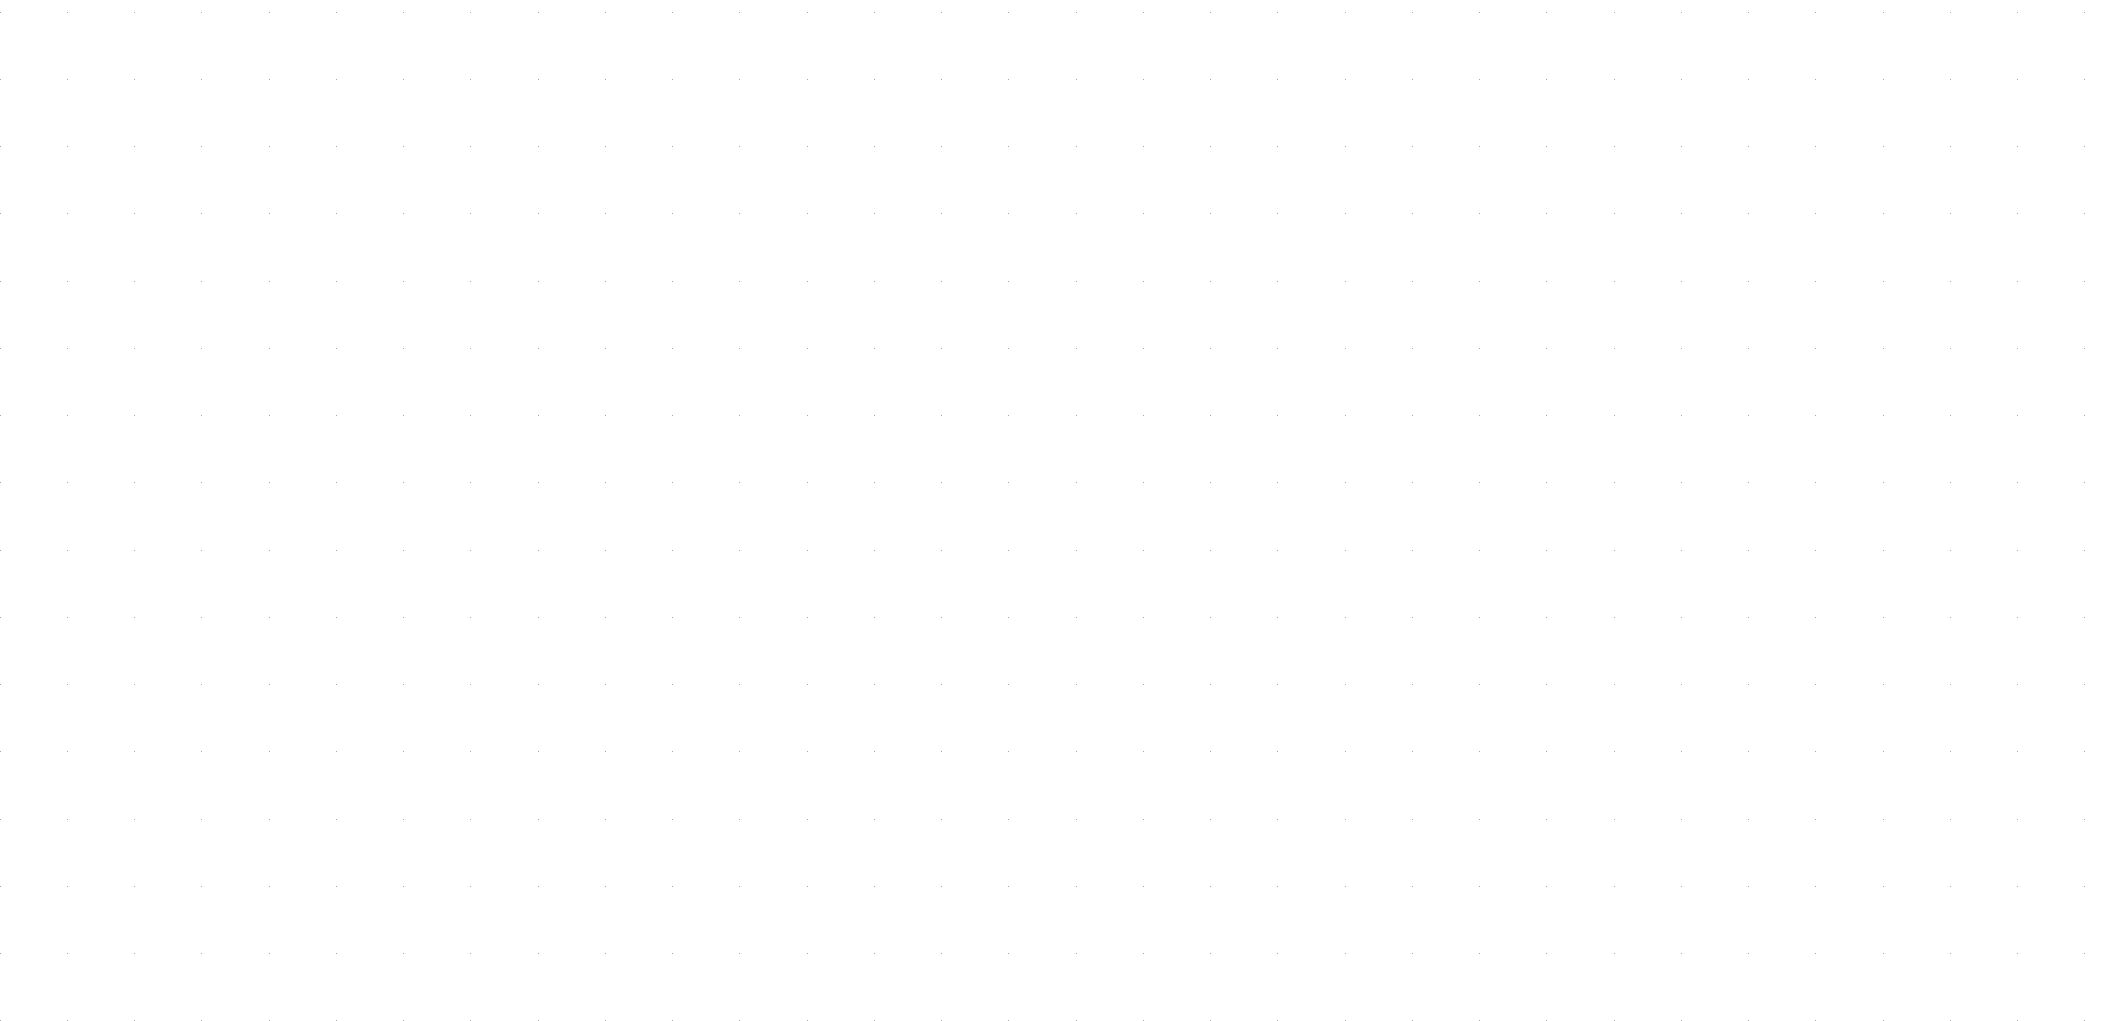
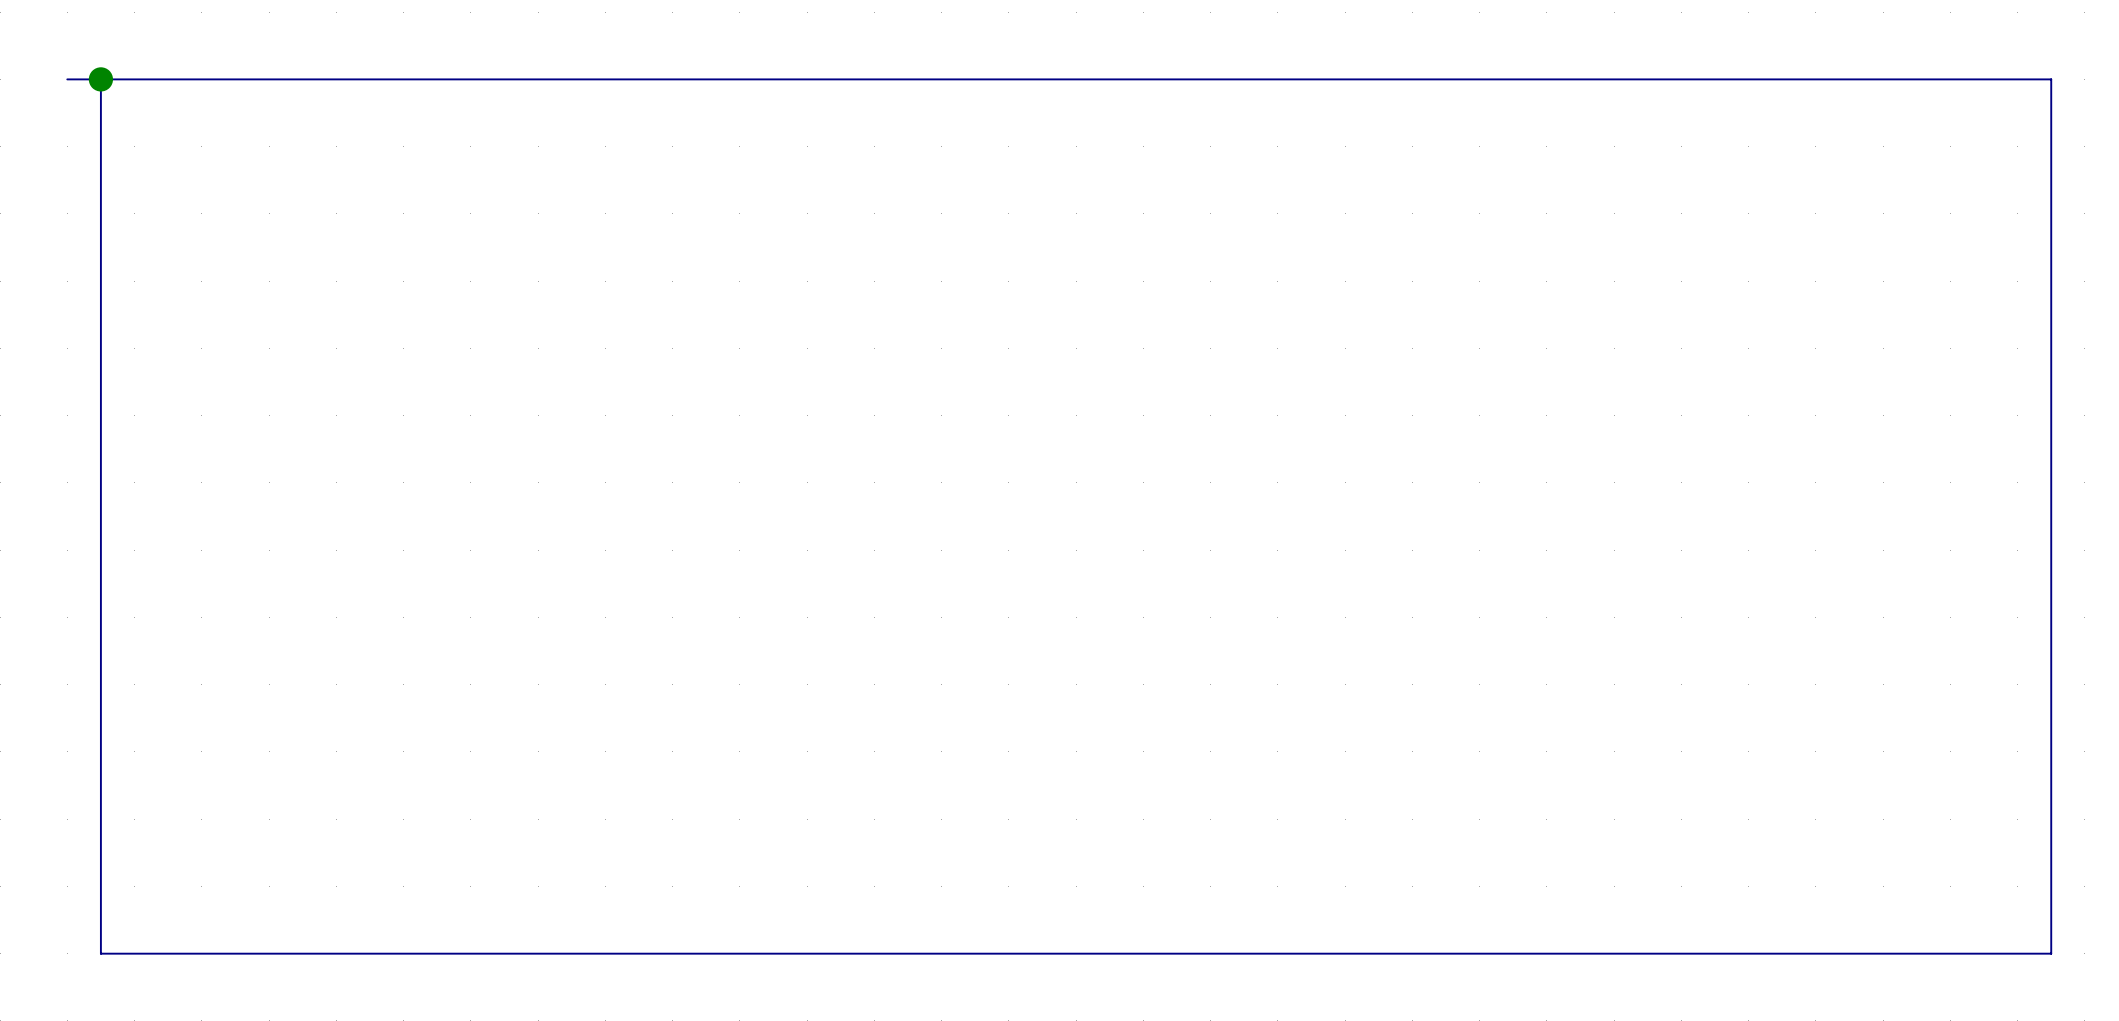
bus: none -> (67, 79) (2051, 79) (2051, 953) (100, 953) (100, 79)
junction: none -> (100, 79)

